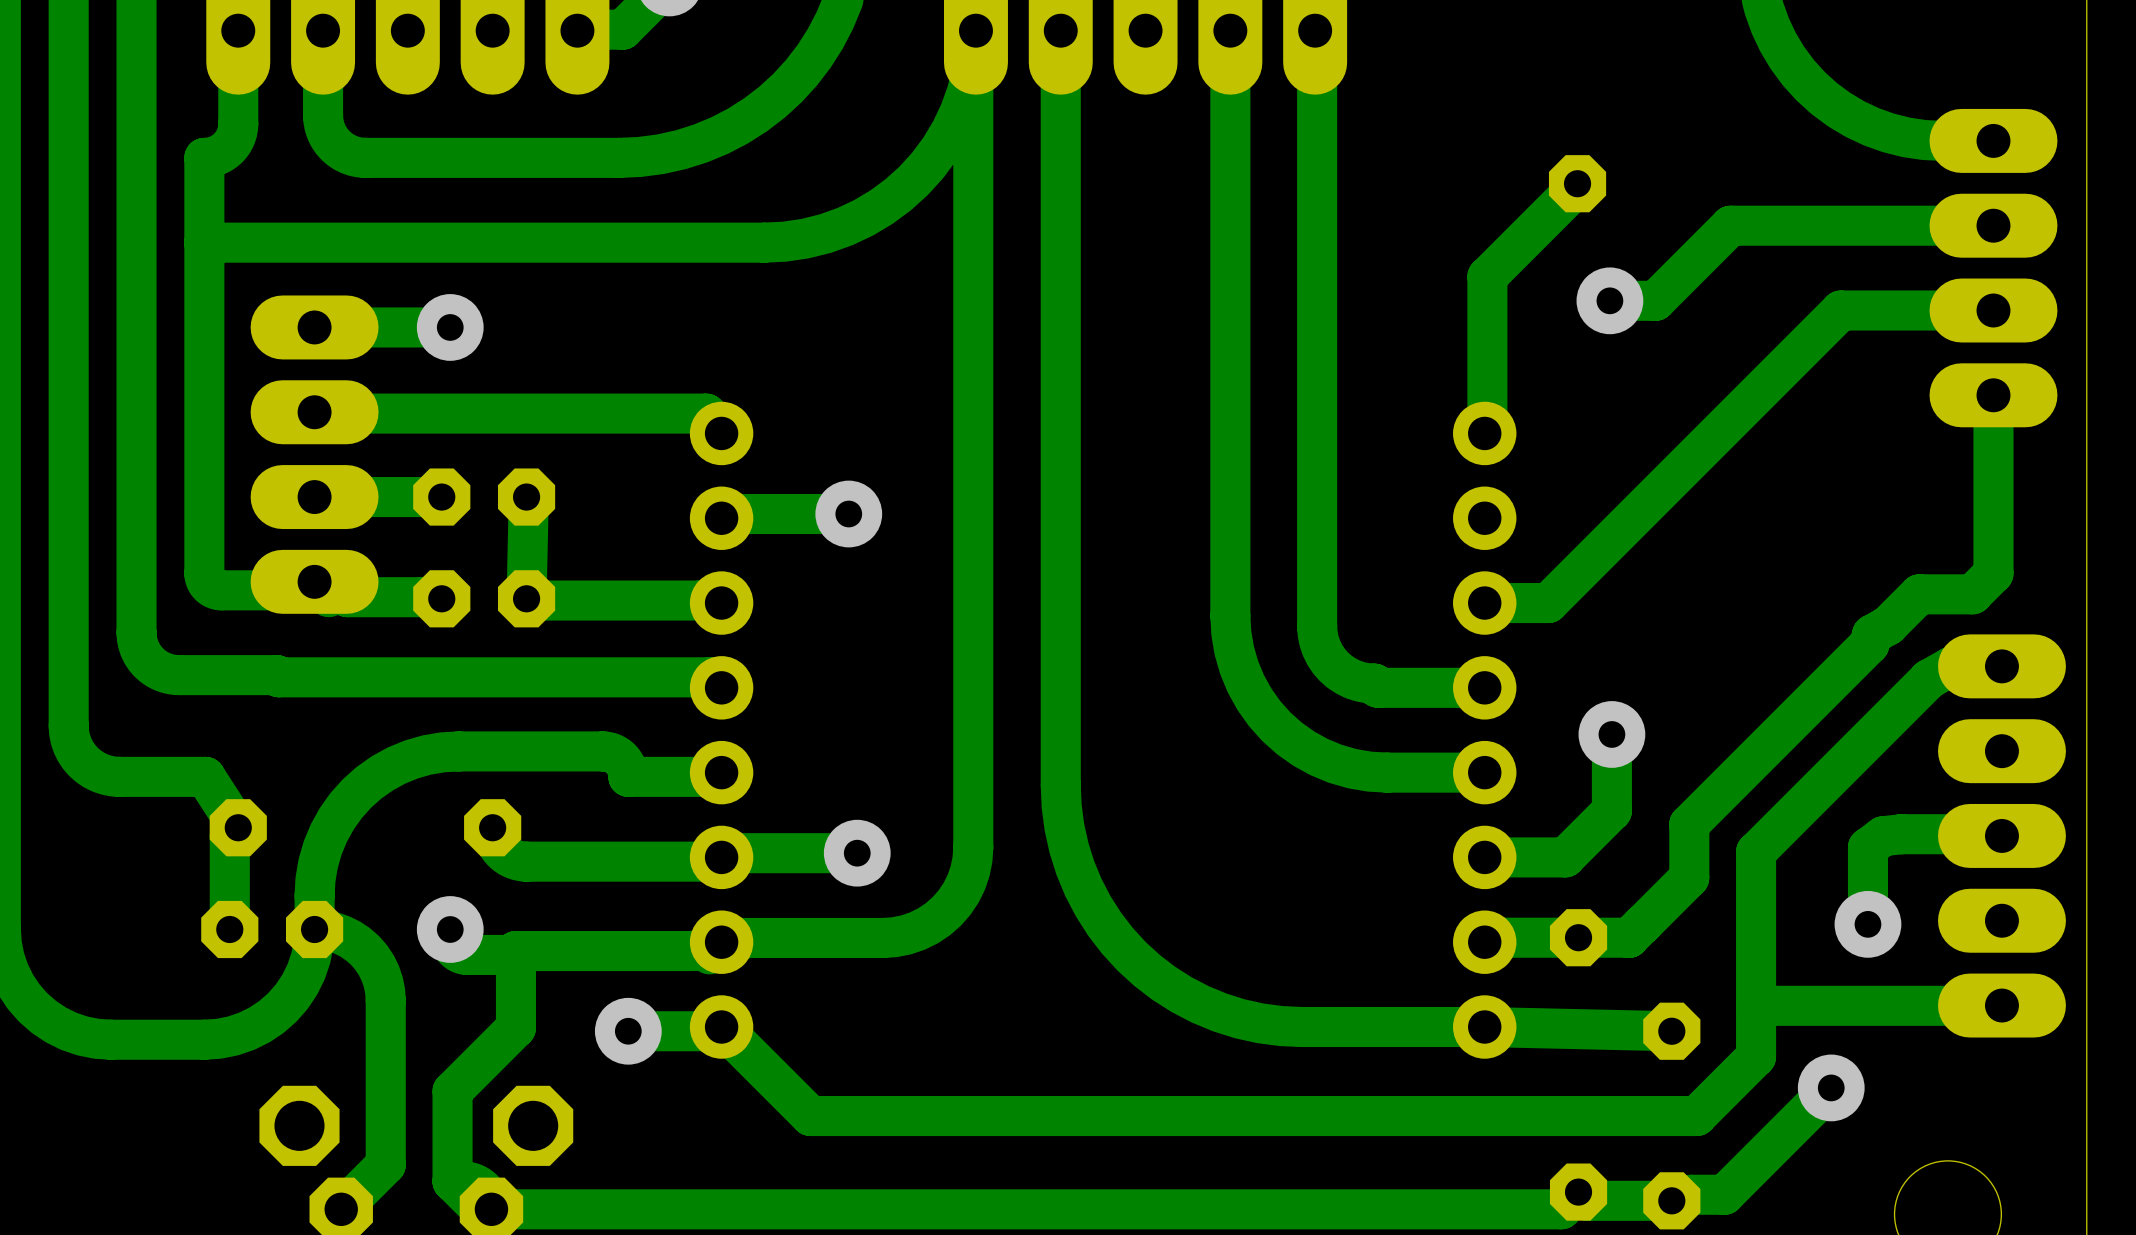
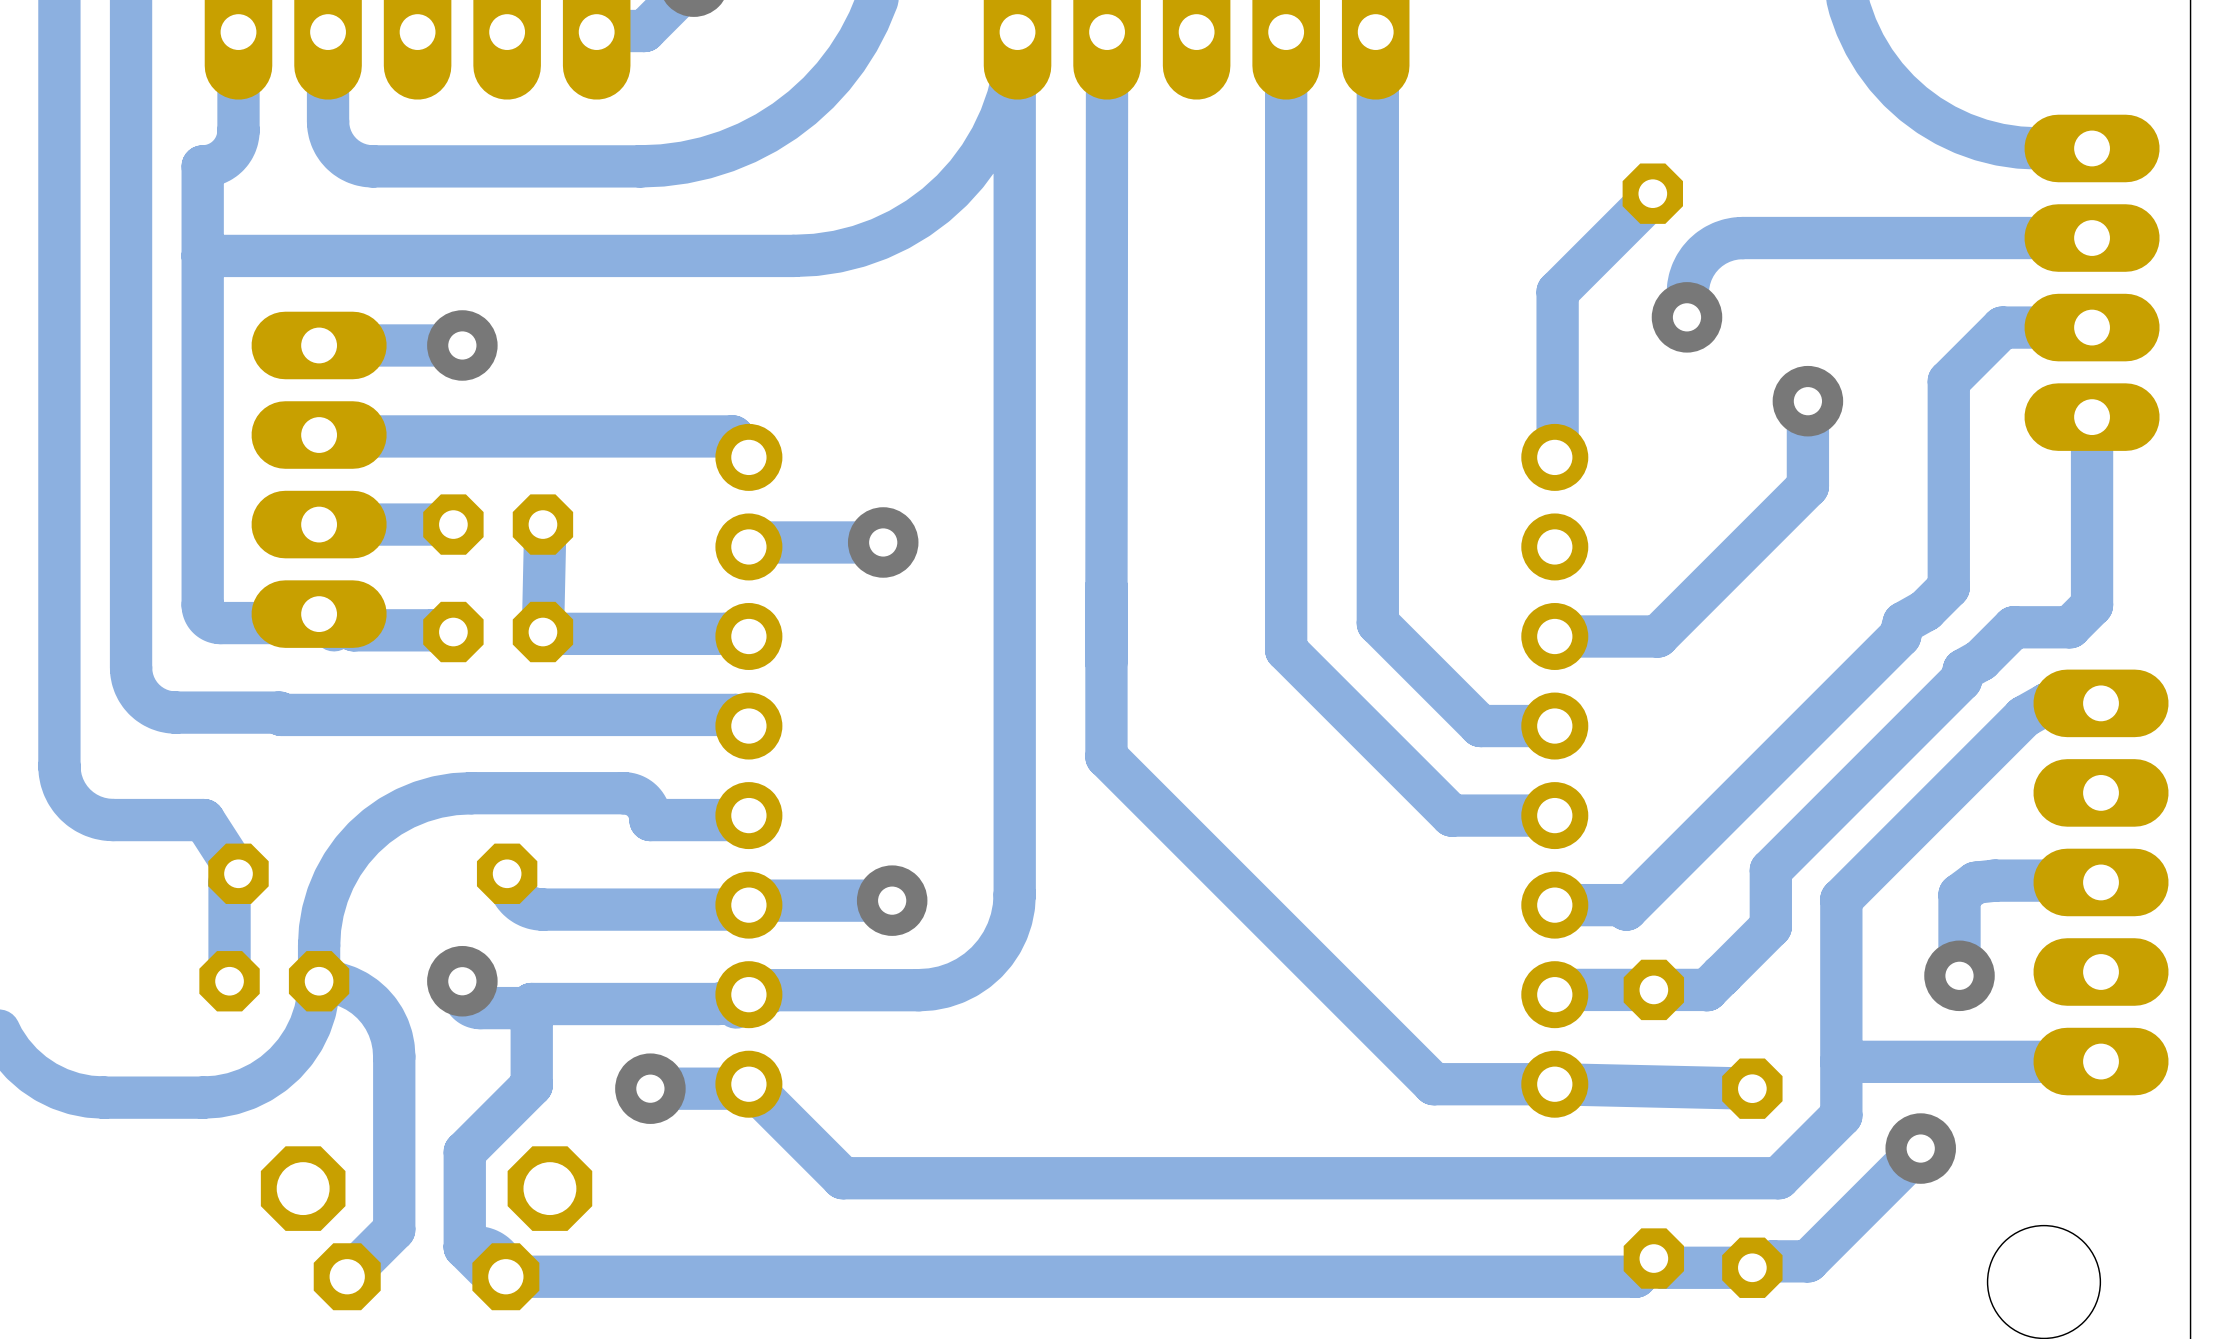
track: (1060, 30) (1060, 785) (1061, 806) (1069, 847) (1083, 887) (1104, 923) (1131, 956) (1163, 983) (1181, 994) (1219, 1012) (1260, 1023) (1302, 1027) (1370, 1027) -> (1107, 32) (1106, 662)
track: (1730, 225) (1655, 300) (1609, 300) -> (1814, 238) (1735, 238) (1715, 245) (1703, 254) (1691, 272) (1688, 285) (1687, 316)
track: (1908, 310) (1840, 310) (1548, 603) -> (1807, 401) (1807, 486) (1657, 636) (1621, 636)
via: none -> (1807, 401)
track: none -> (1106, 587) (1106, 756) (1433, 1084)
track: (1317, 590) (1319, 641) (1324, 654) (1333, 666) (1352, 679) (1374, 683) (1377, 687) (1414, 687) -> (1377, 623) (1480, 726)
track: (1230, 615) (1234, 650) (1239, 667) (1254, 699) (1276, 726) (1303, 748) (1335, 763) (1352, 768) (1387, 772) -> (1286, 649) (1451, 815)
track: (1611, 734) (1611, 810) (1565, 857) (1548, 857) -> (2002, 327) (1948, 381) (1948, 587) (1925, 610) (1903, 622) (1900, 635) (1626, 909) (1621, 905)
via: (1611, 734) -> none

